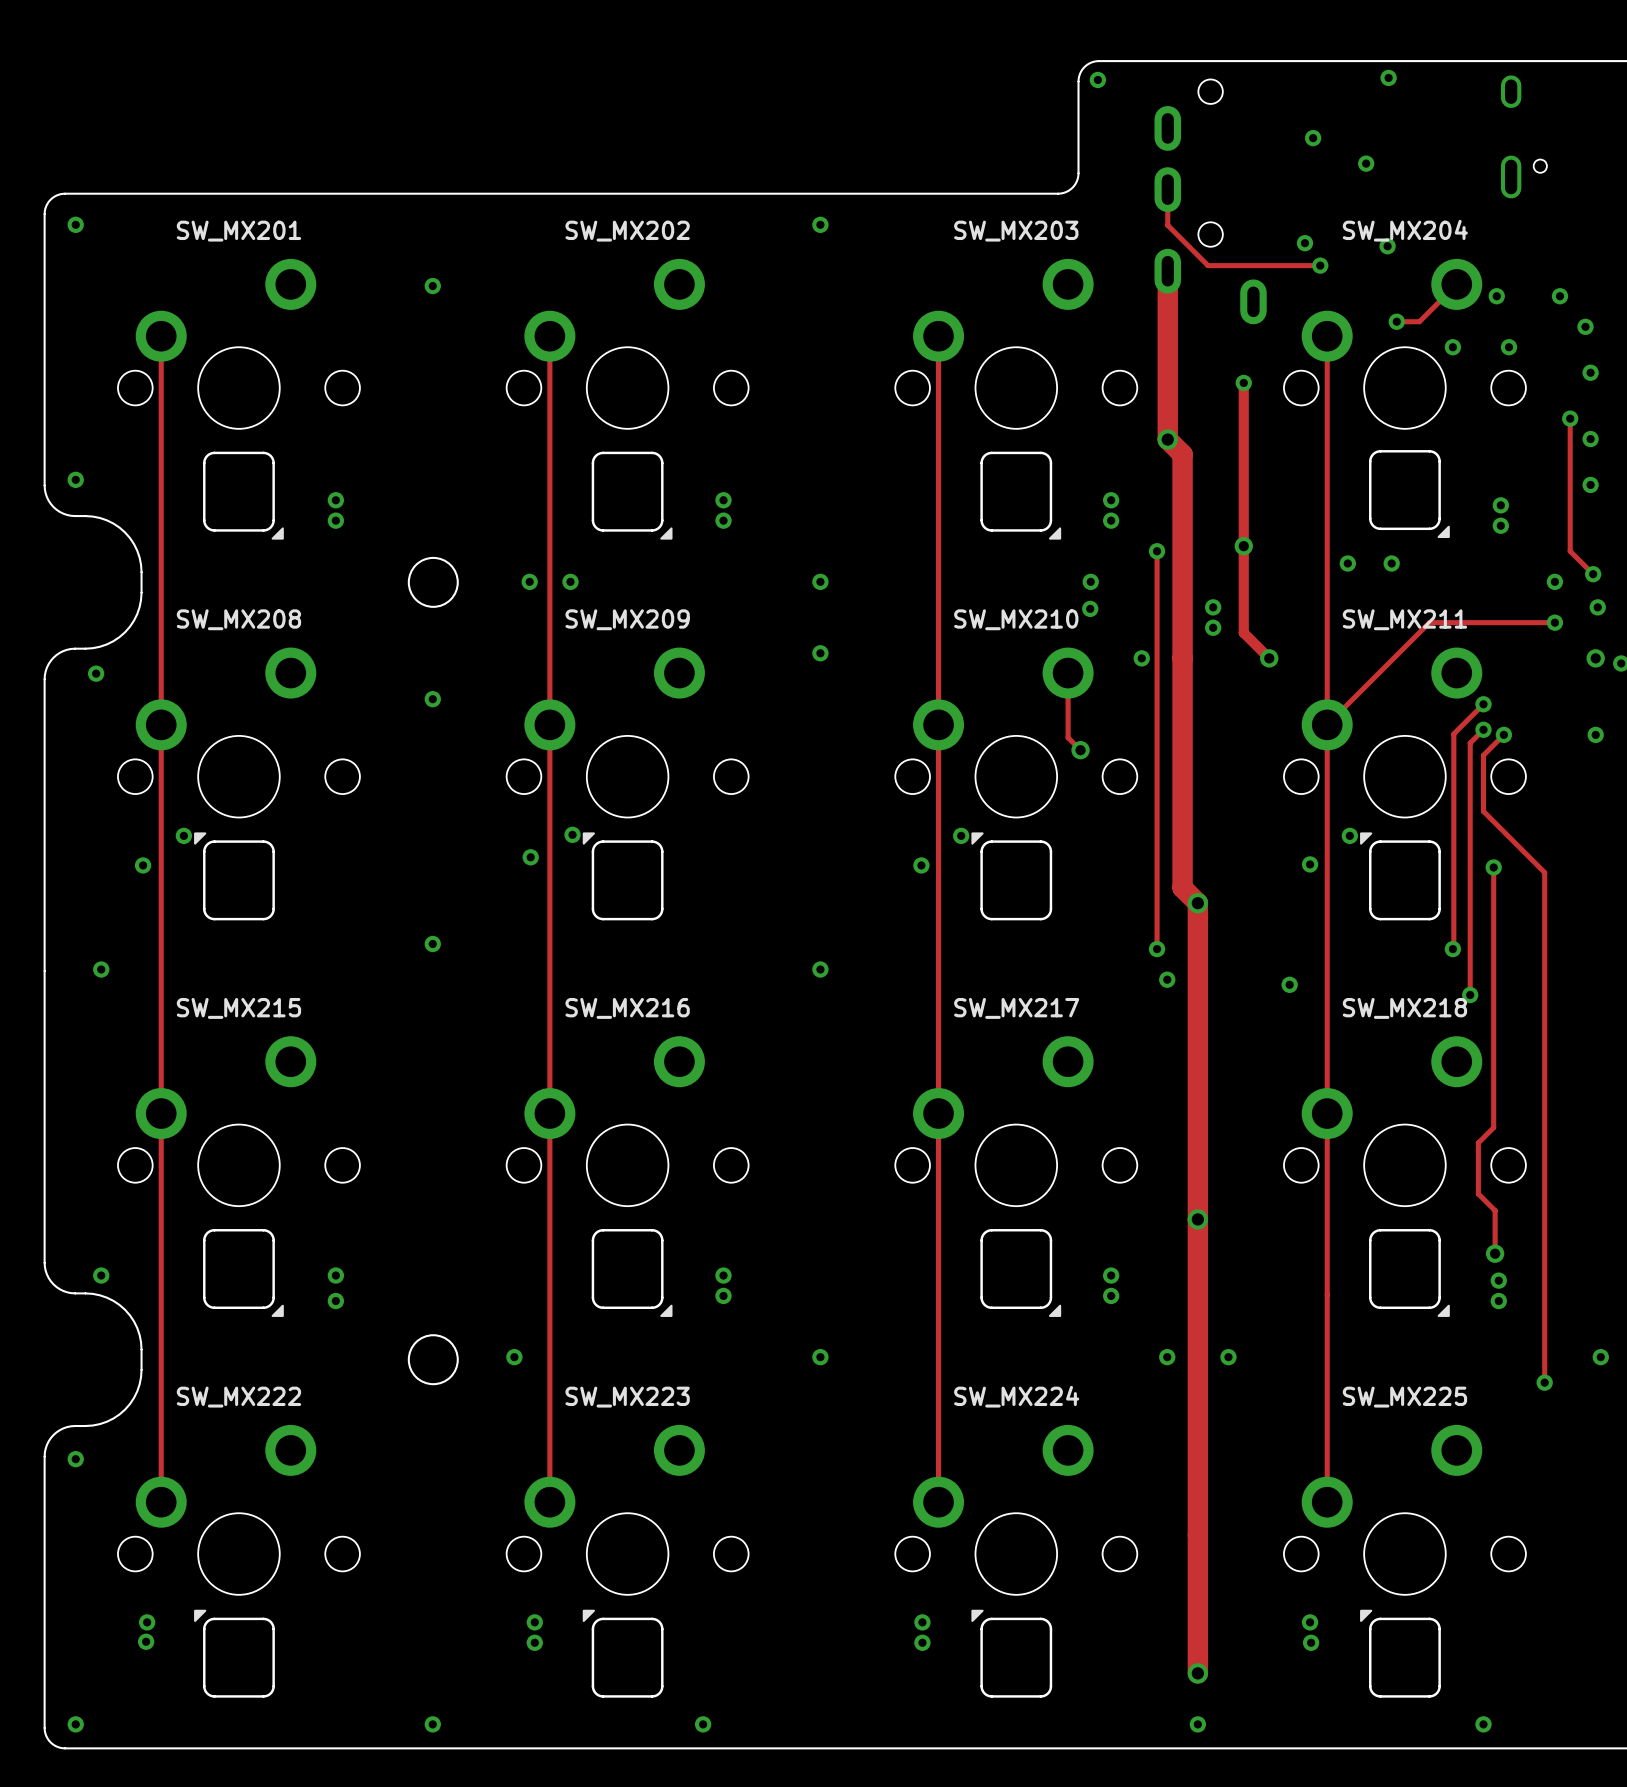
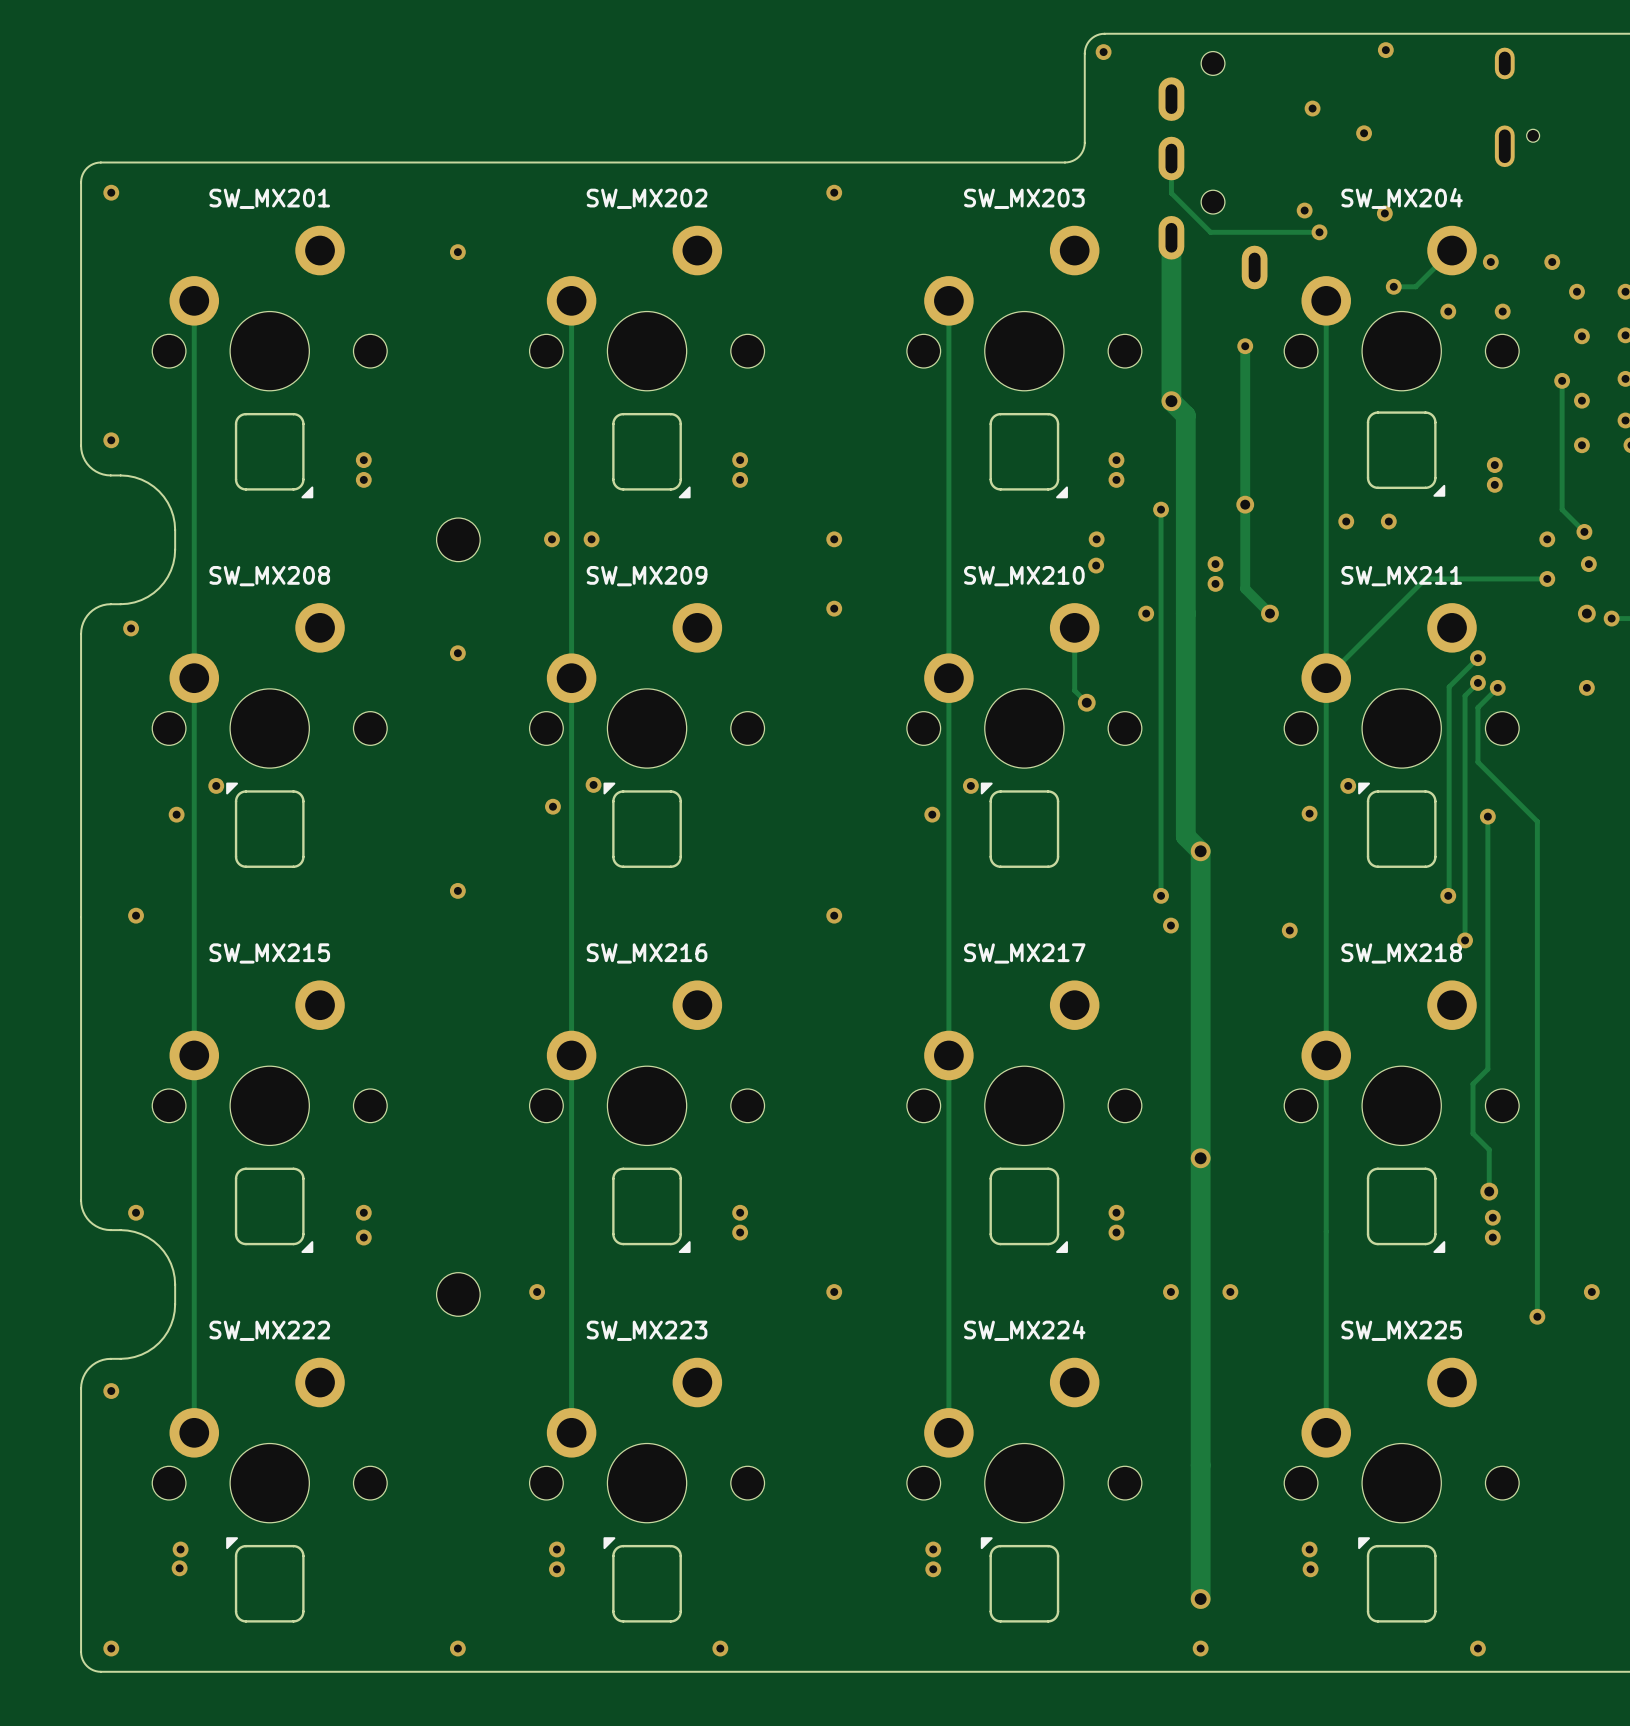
round board edge: [407, 556, 459, 608] -> none
part: none -> (458, 539)
round board edge: [407, 1334, 459, 1386] -> none
part: none -> (458, 1294)

